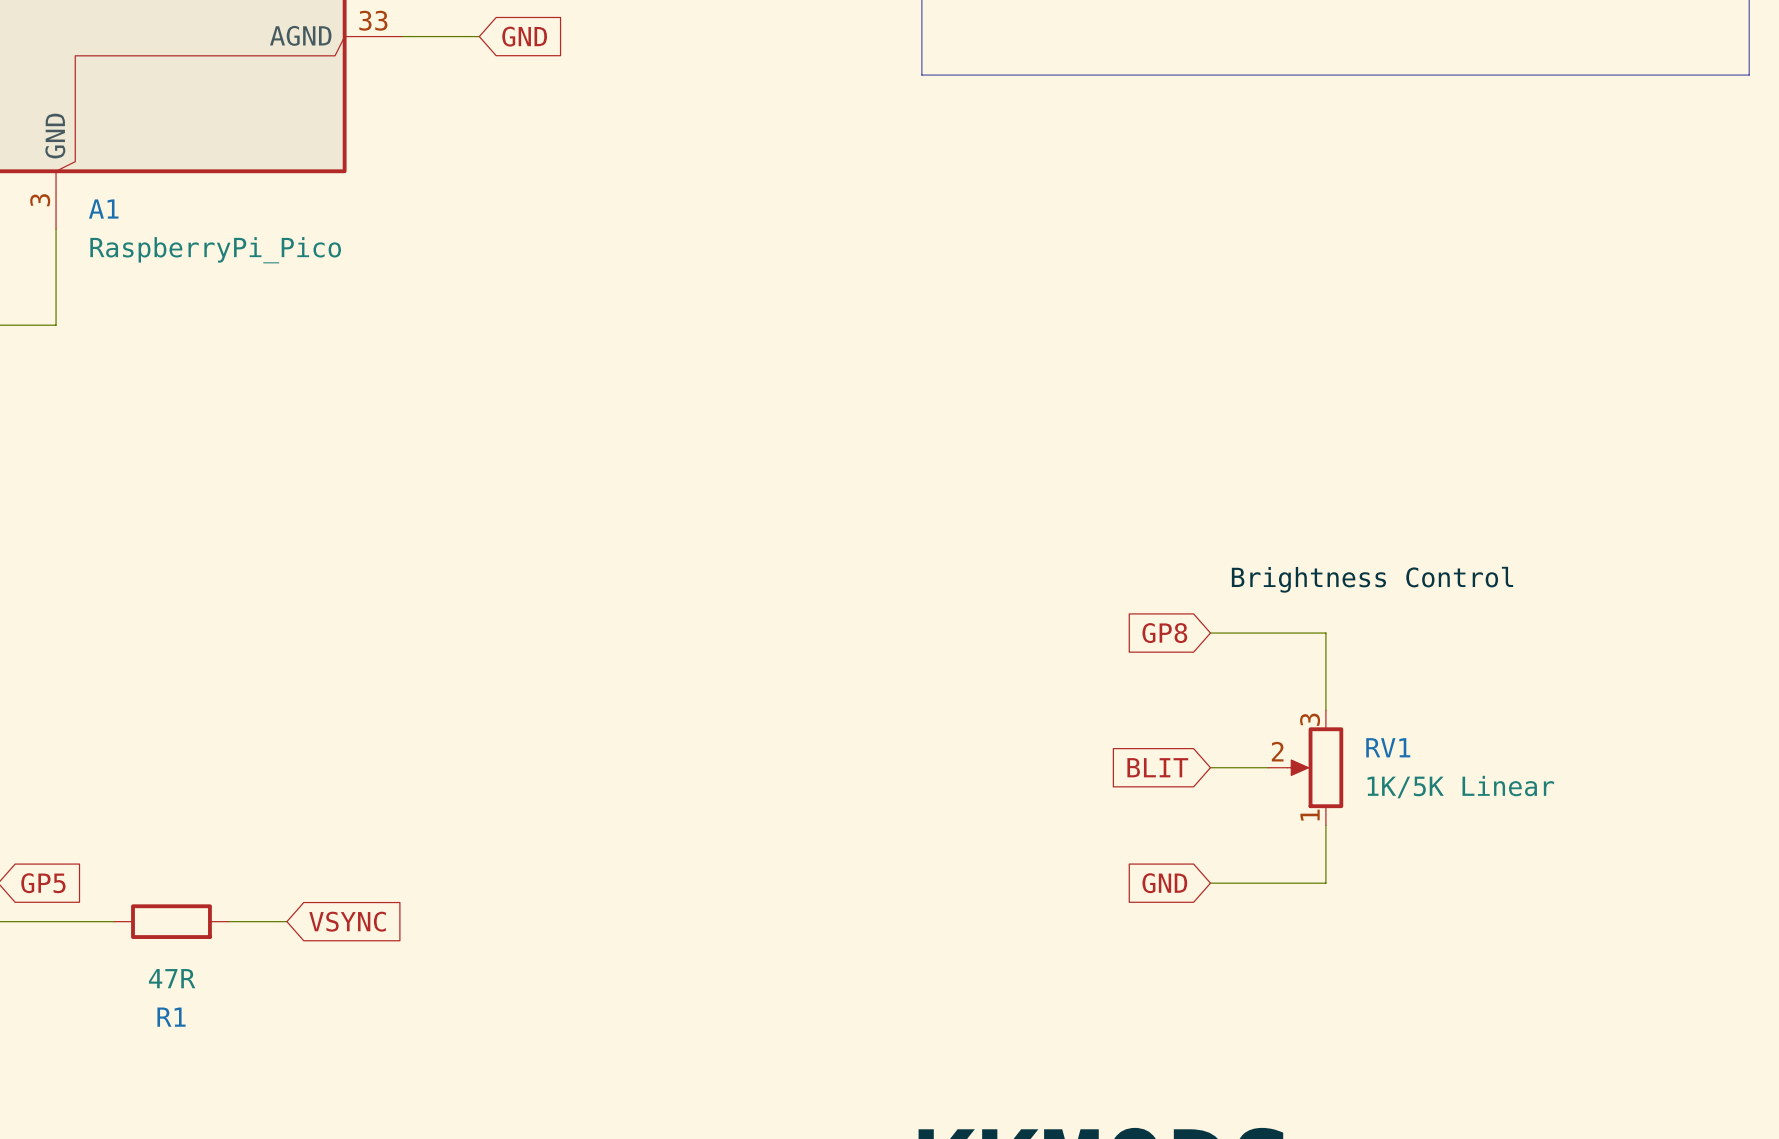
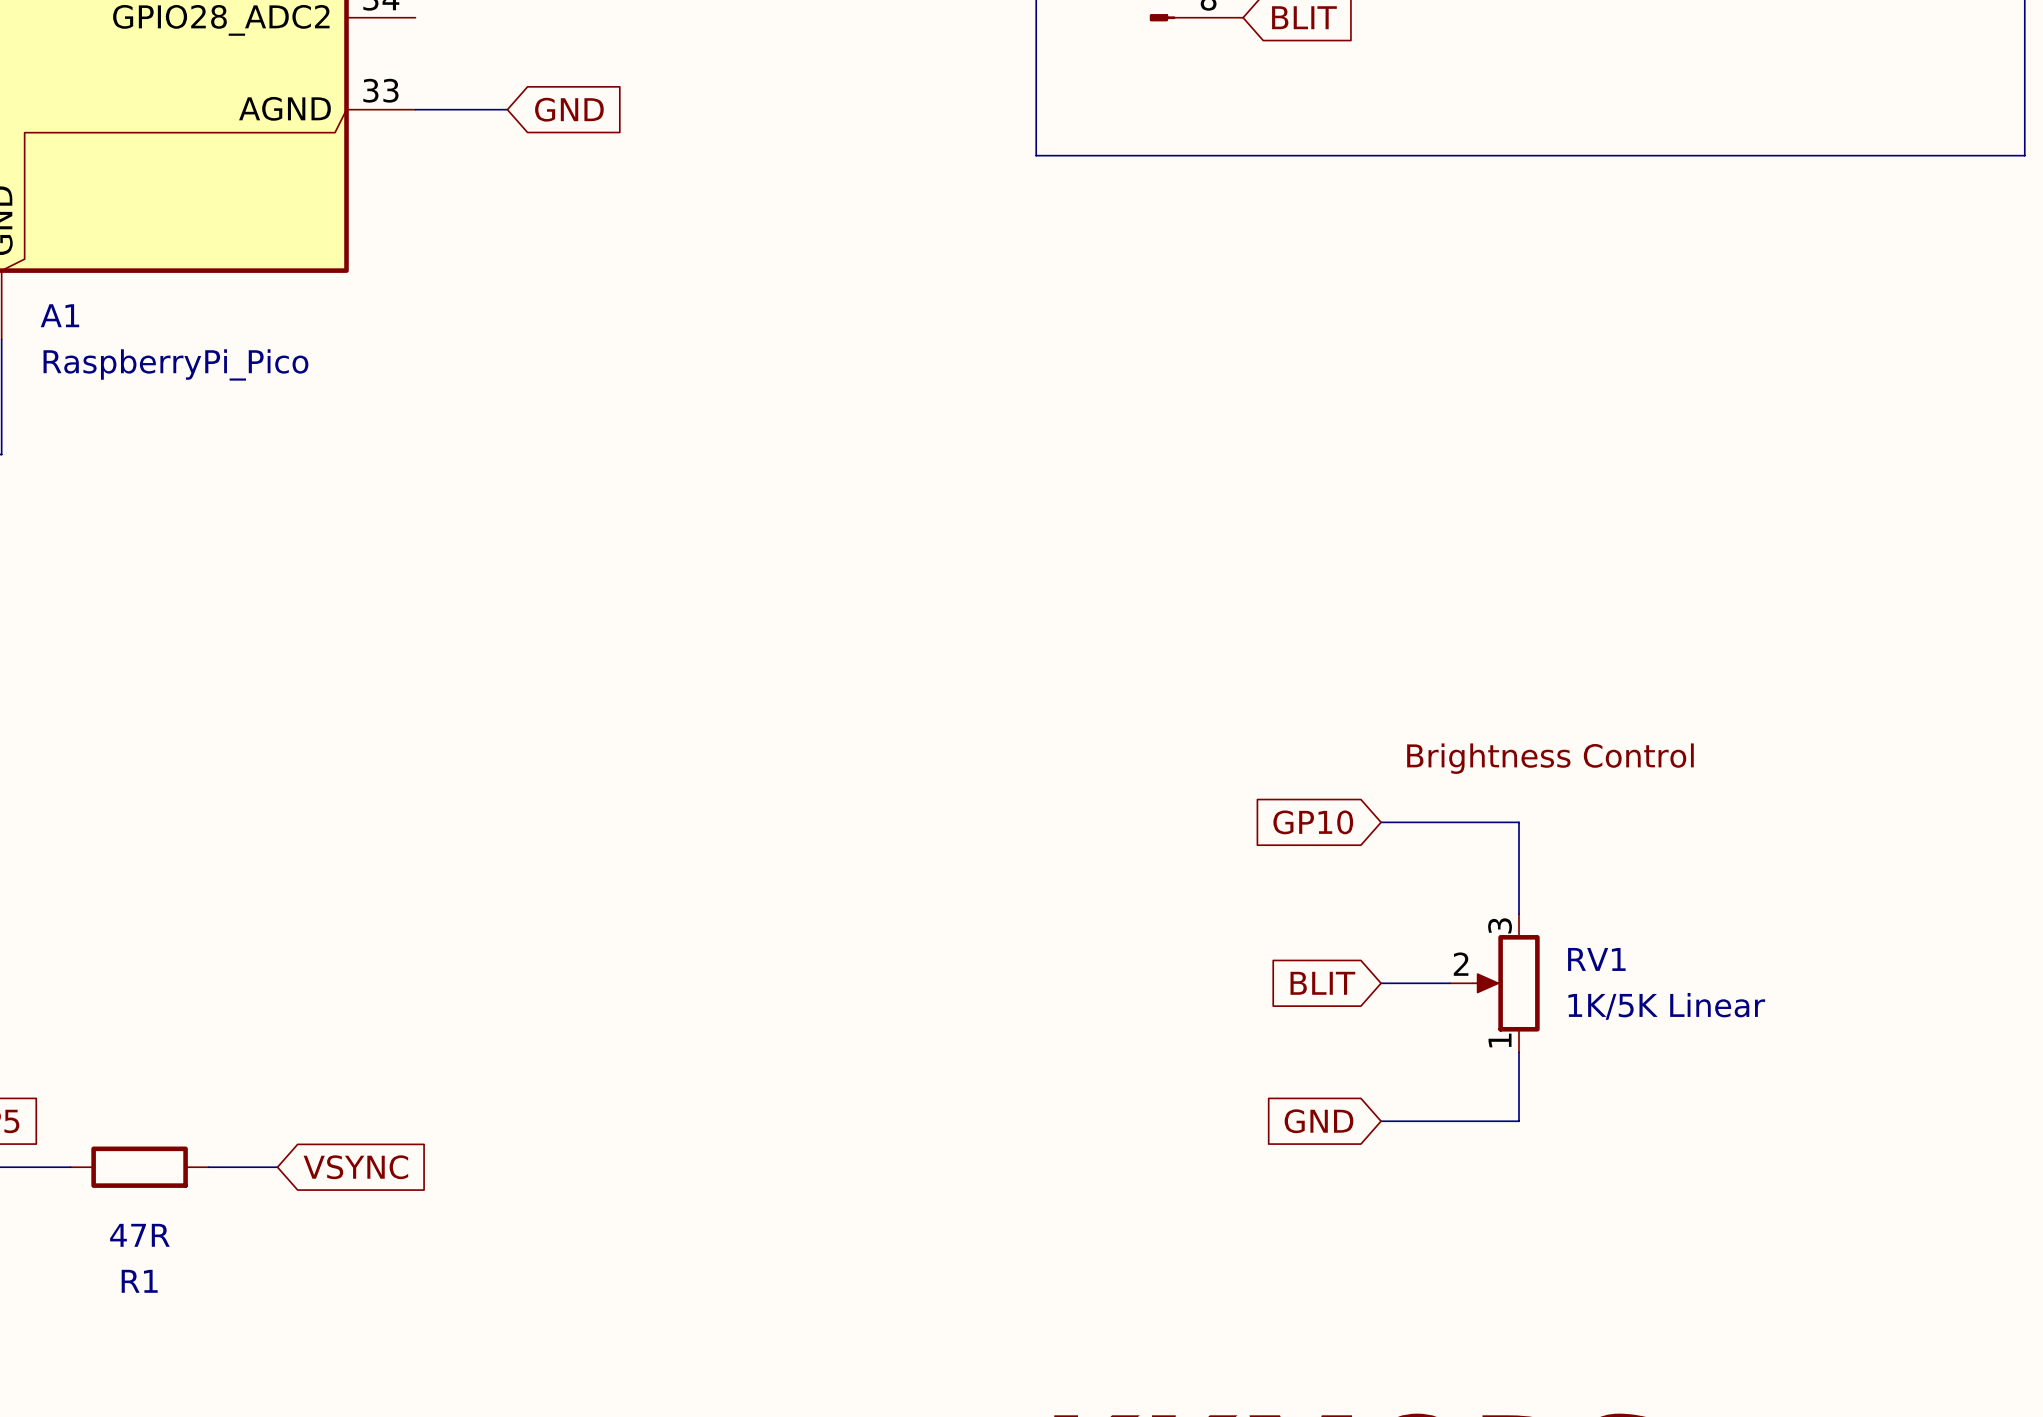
global label: GP8 (1164, 633) -> GP10 (1313, 822)

